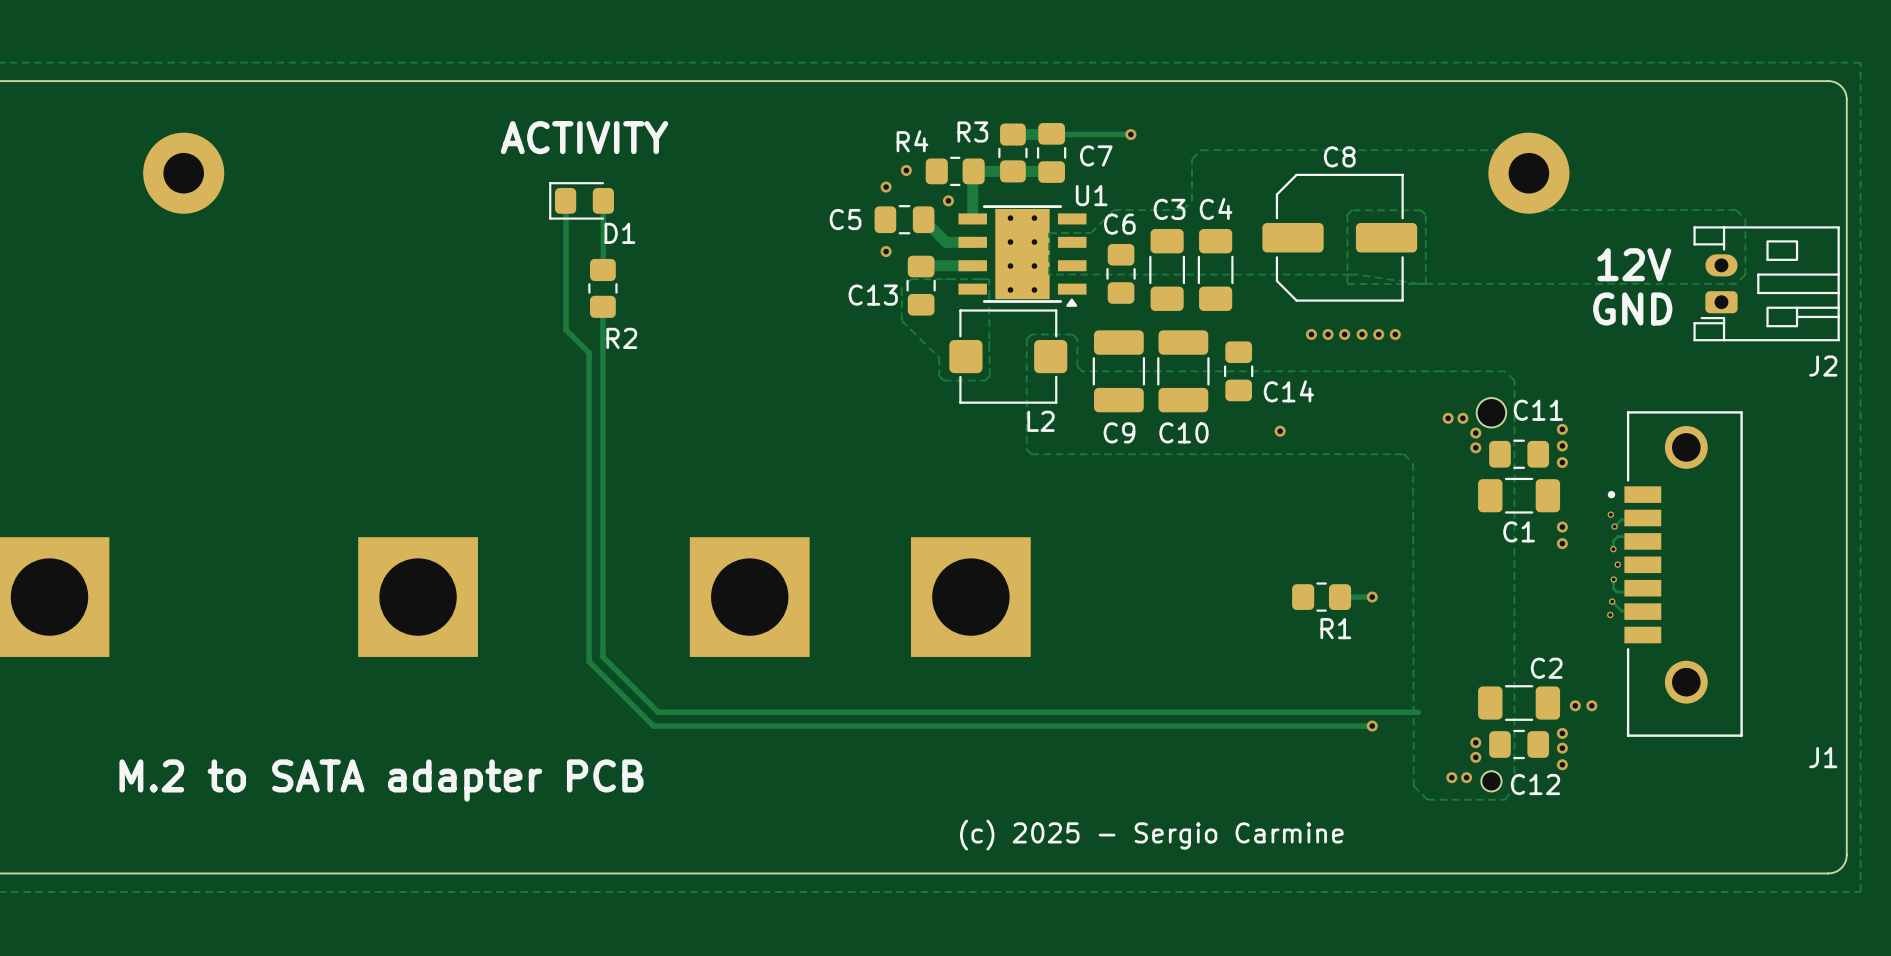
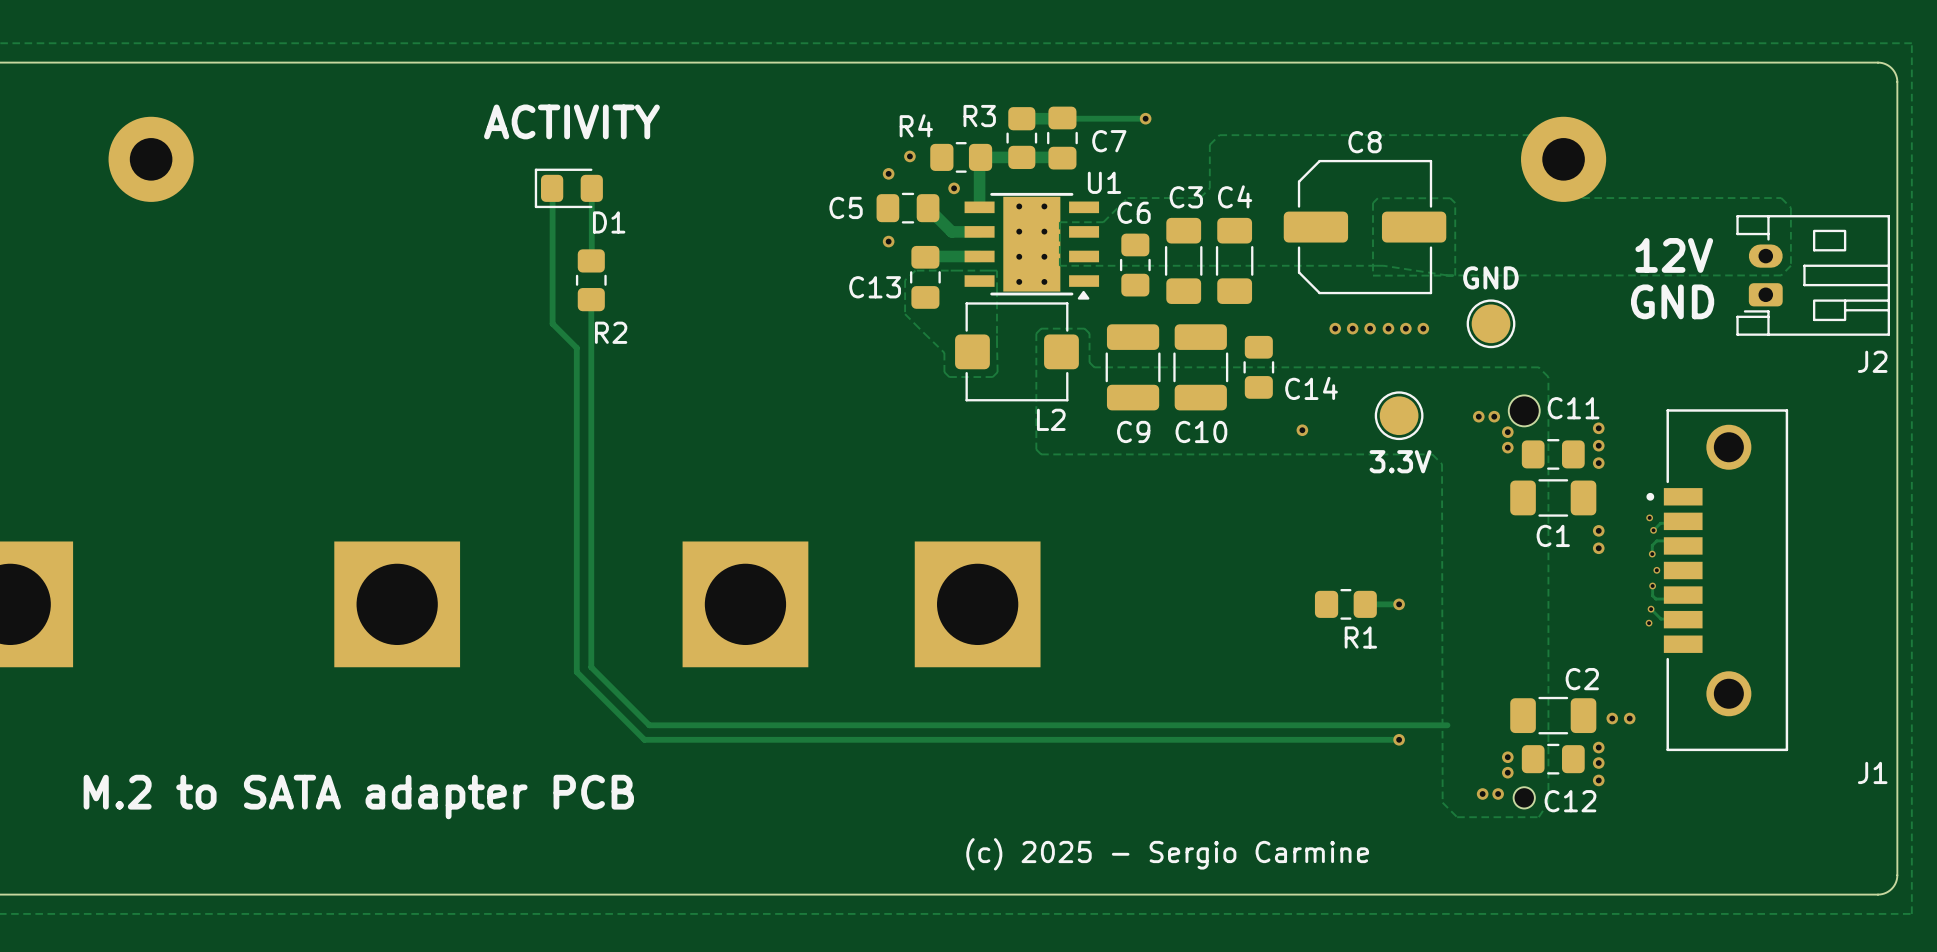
text: none -> GND (1490, 277)
part: none -> (1491, 323)
part: none -> (1399, 415)
text: none -> 3.3V (1400, 461)

